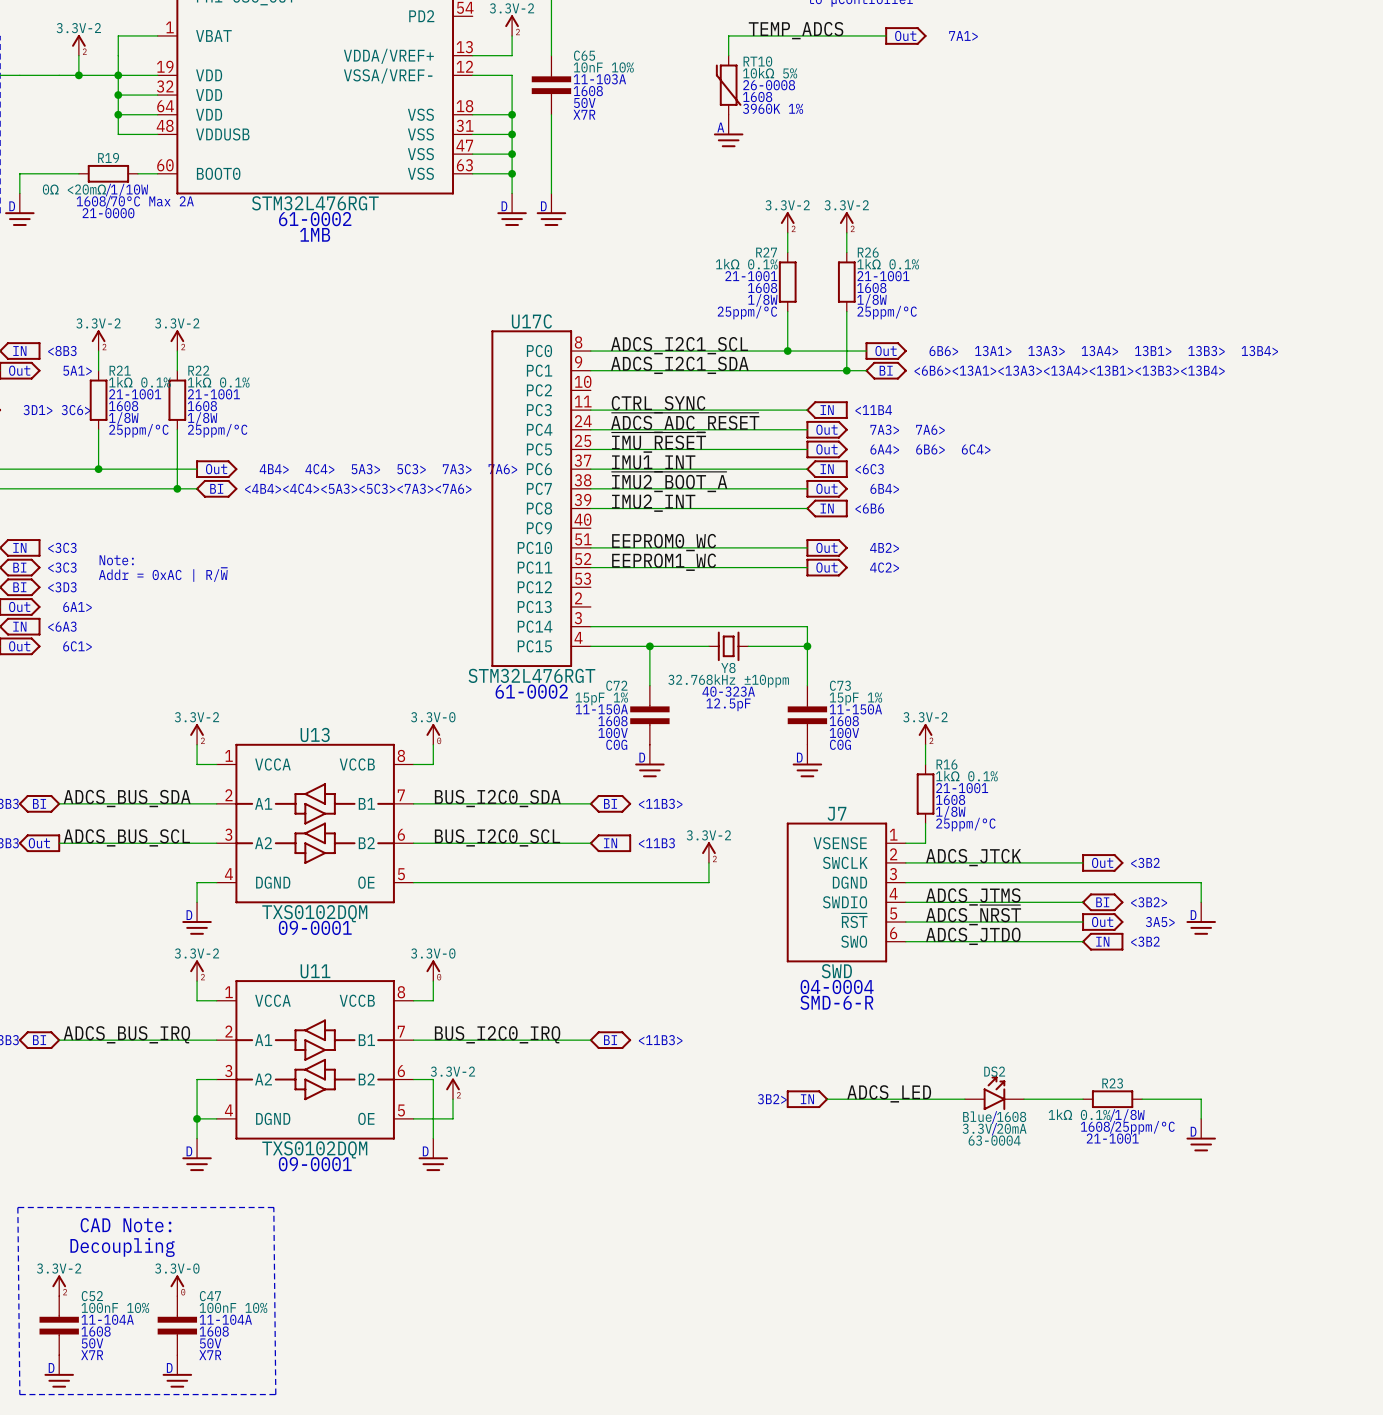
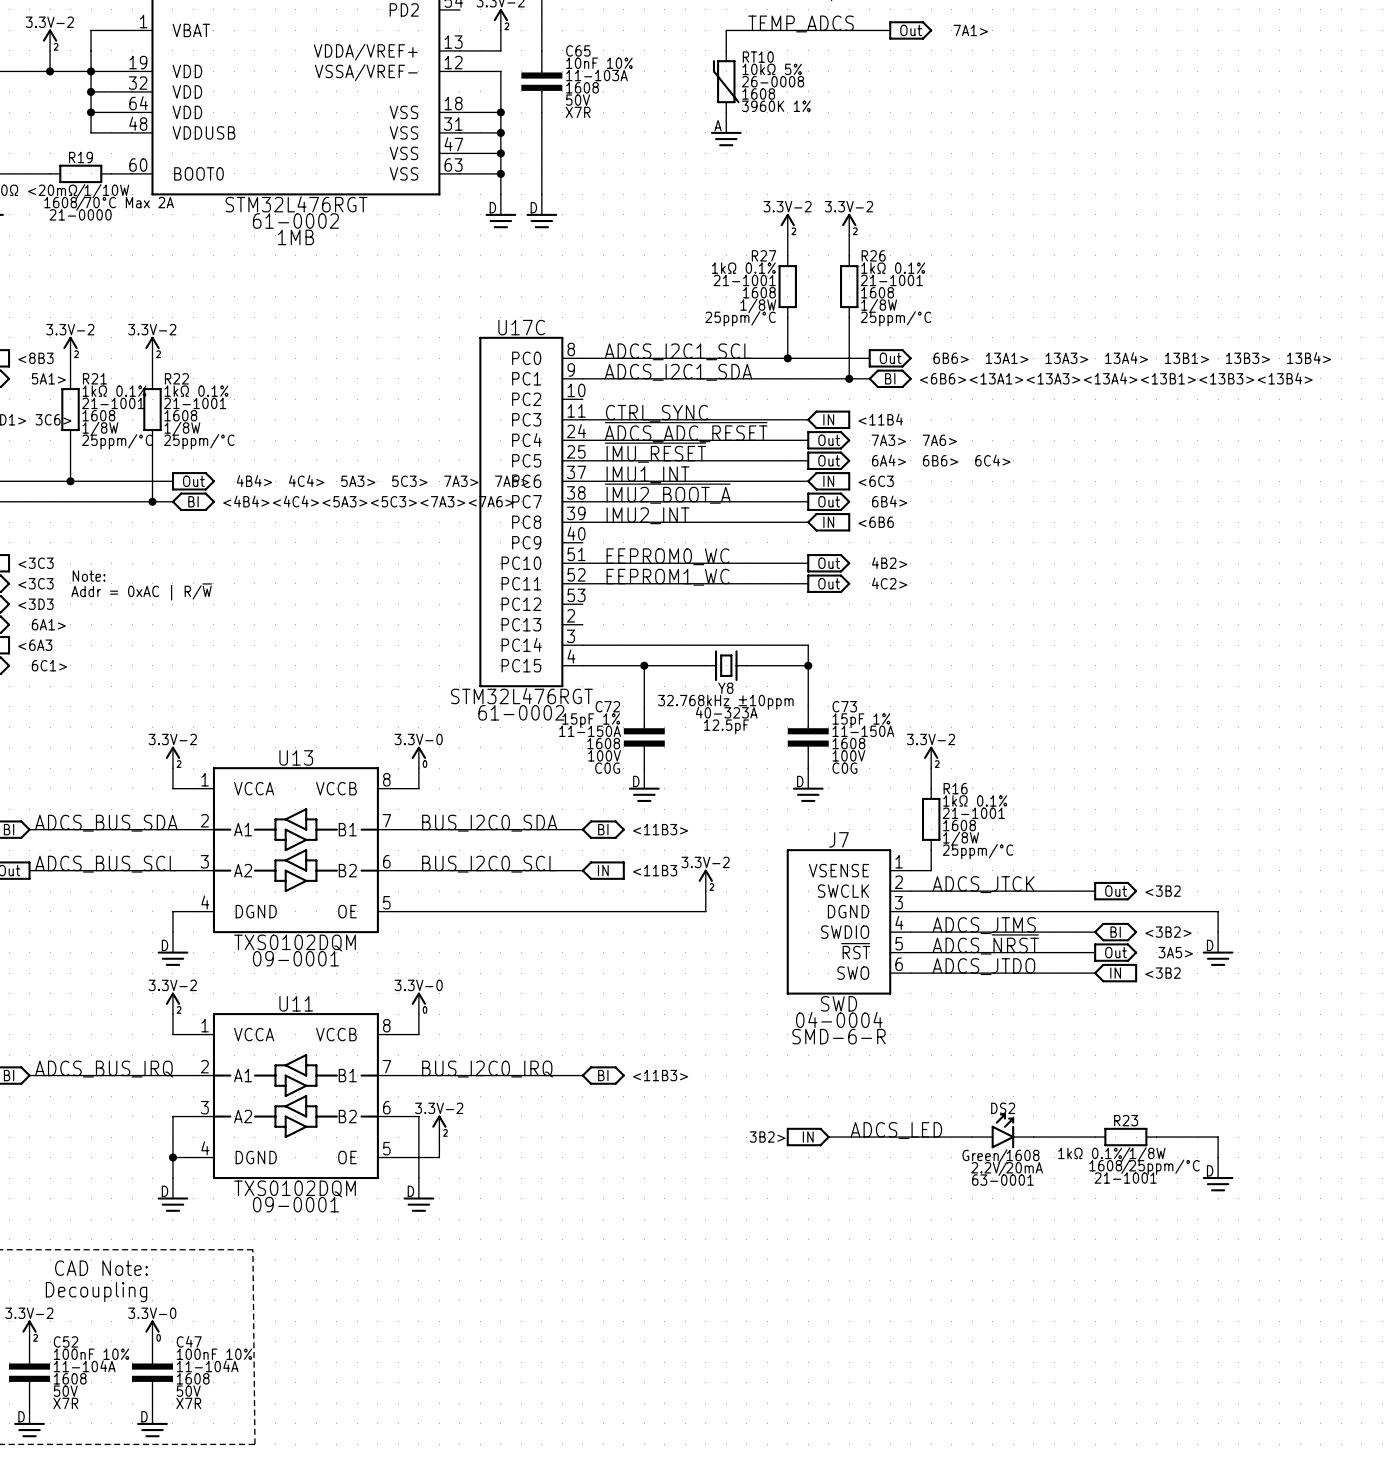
DS2 value: Blue (977, 1116) -> Green (980, 1155)
DS2 text: 3.3V (977, 1128) -> 2.2V (985, 1167)
DS2 text: 63-0004 (994, 1140) -> 63-0001 (1002, 1180)

